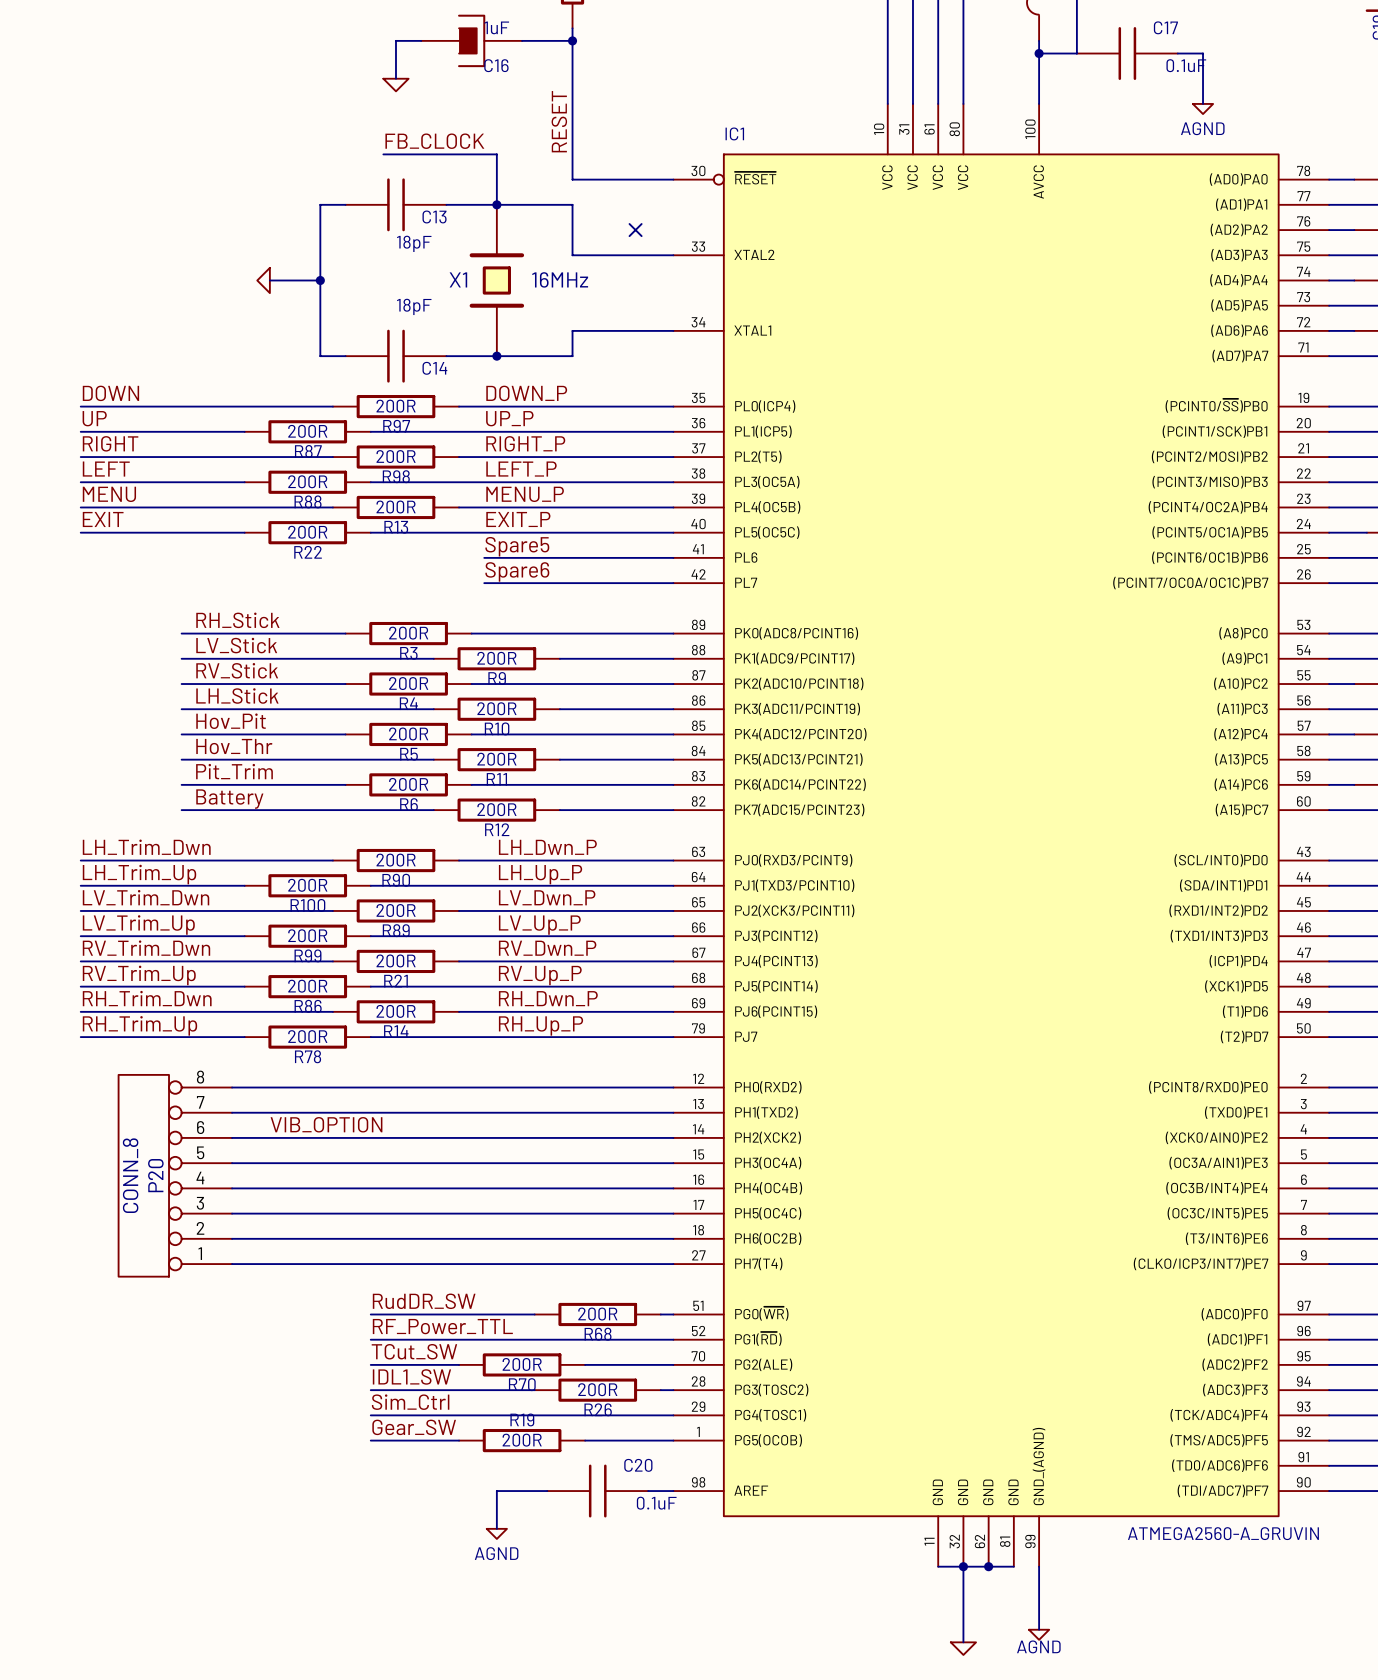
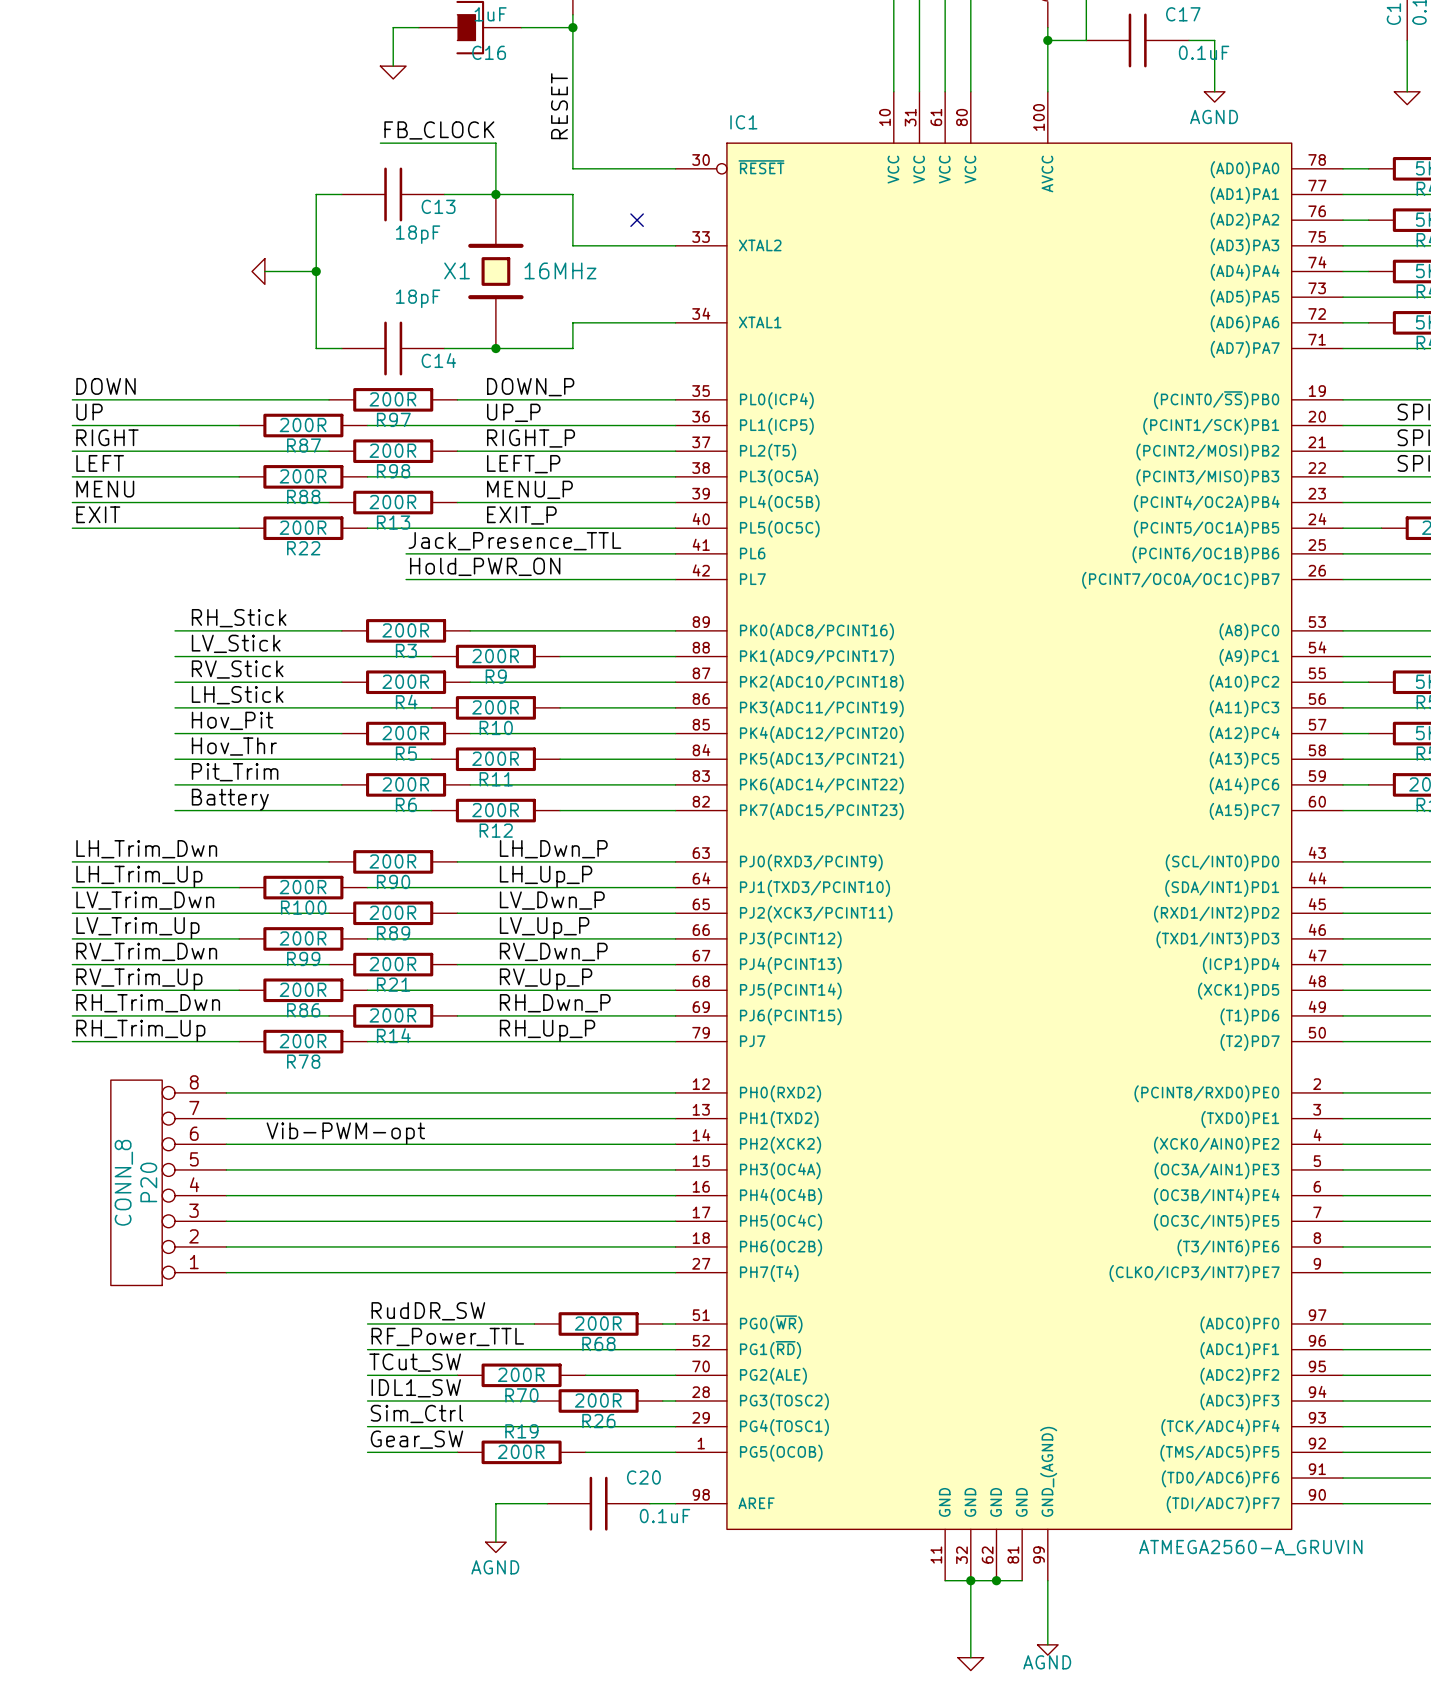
label: none -> Jack_Presence_TTL (514, 541)
label: Spare5 (517, 546) -> none
wire: none -> (406, 553) (483, 553)
label: none -> Hold_PWR_ON (485, 566)
label: Spare6 (517, 571) -> none
wire: none -> (406, 579) (483, 579)
label: VIB_OPTION (326, 1124) -> Vib-PWM-opt (345, 1133)

